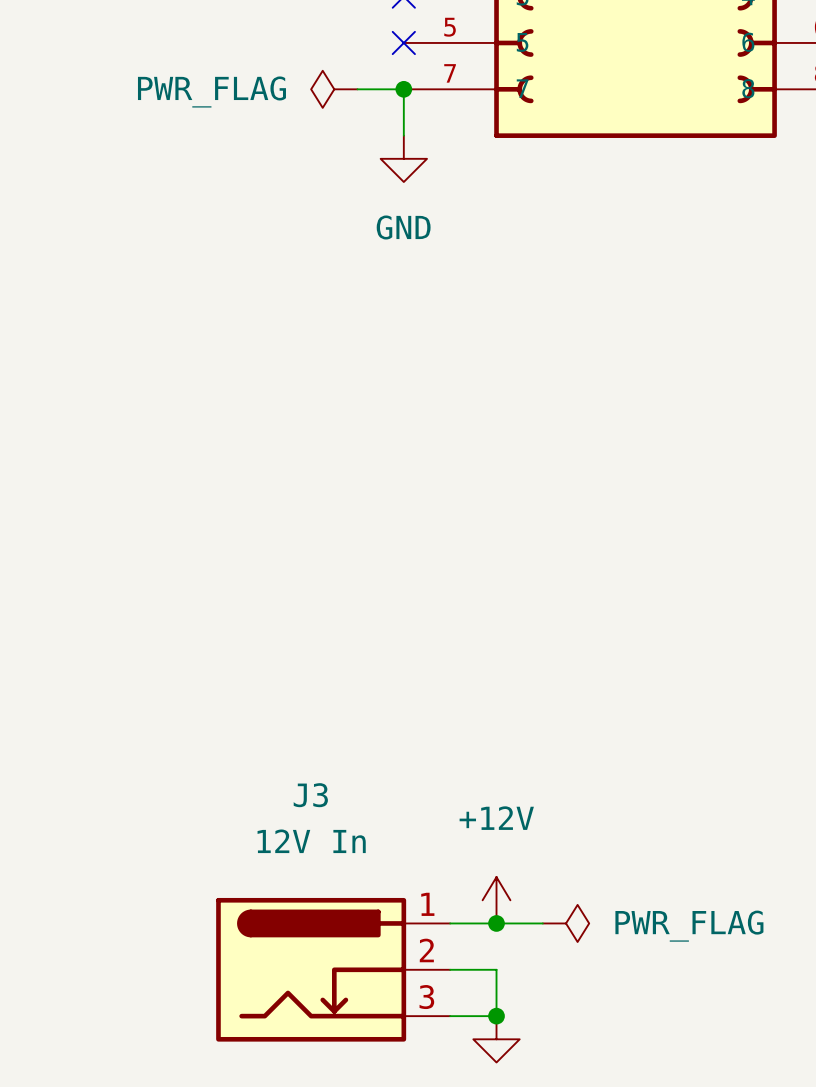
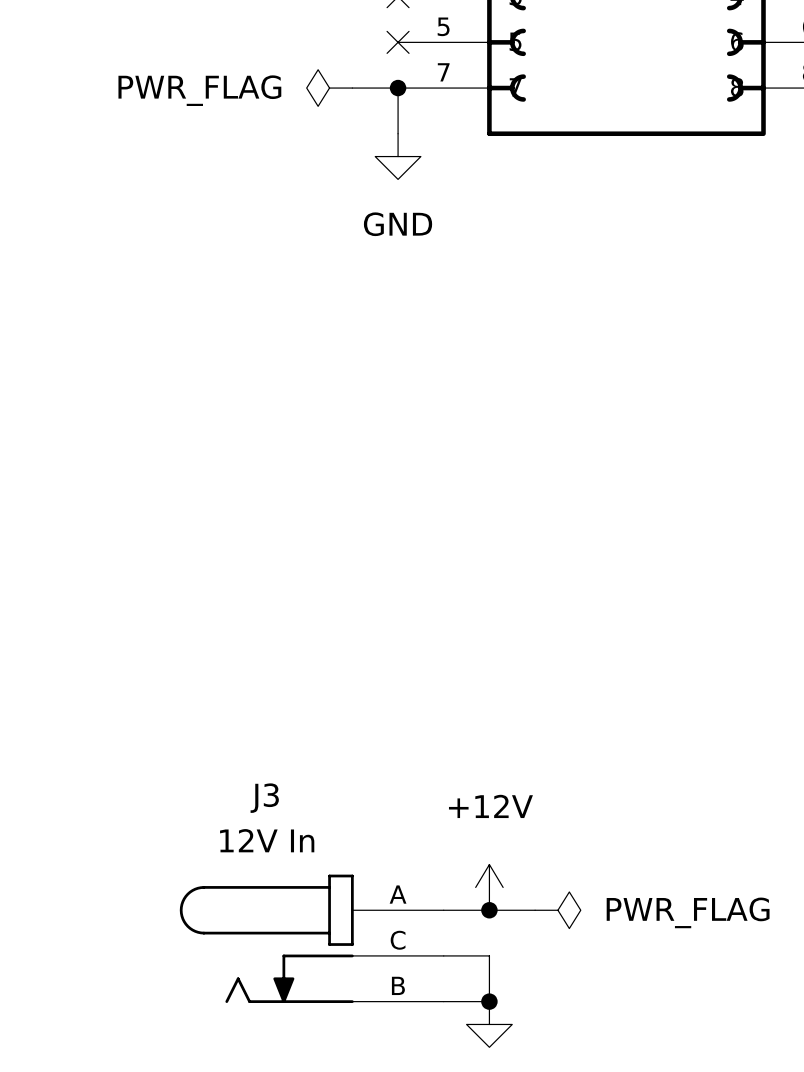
J3 name position: J3 (310, 795) -> J3 (264, 798)
J3 value position: 12V In (311, 841) -> 12V In (267, 840)
J3 symbol: [216, 897, 451, 1042] -> [179, 874, 444, 1003]

